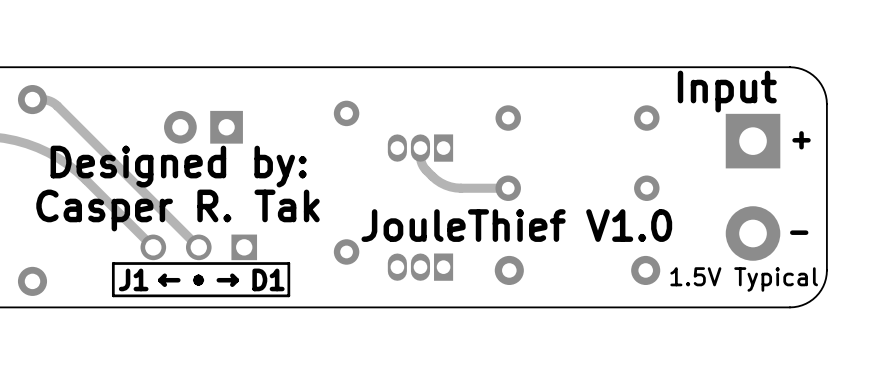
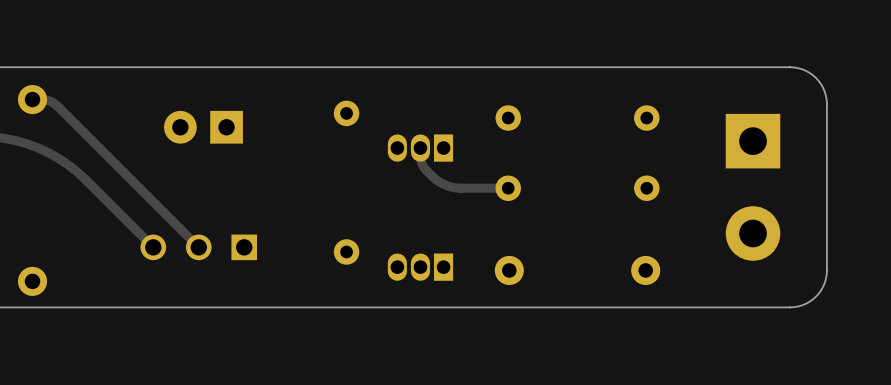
text: Input (727, 91) -> none
text: + (801, 140) -> none
text: Designed by: (178, 166) -> none
text: Casper R. Tak (177, 210) -> none
text: JouleThief V1.0 (516, 225) -> none
text: - (799, 232) -> none
line: (288, 263) (288, 295) (113, 295) (113, 263) (288, 263) -> none
text: J1 (133, 279) -> none
text: D1 (268, 279) -> none
text: 1.5V Typical (744, 279) -> none
text: ←•→ (198, 280) -> none

